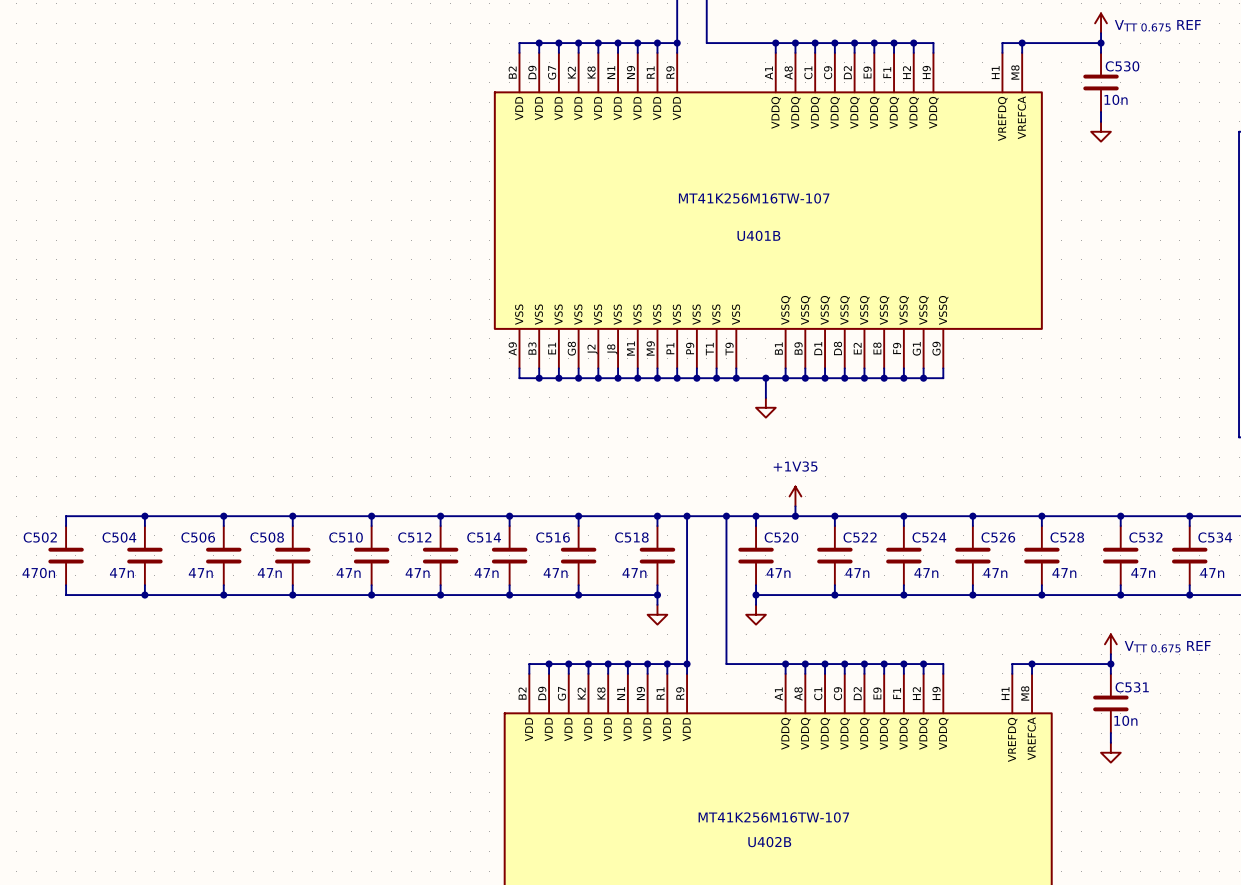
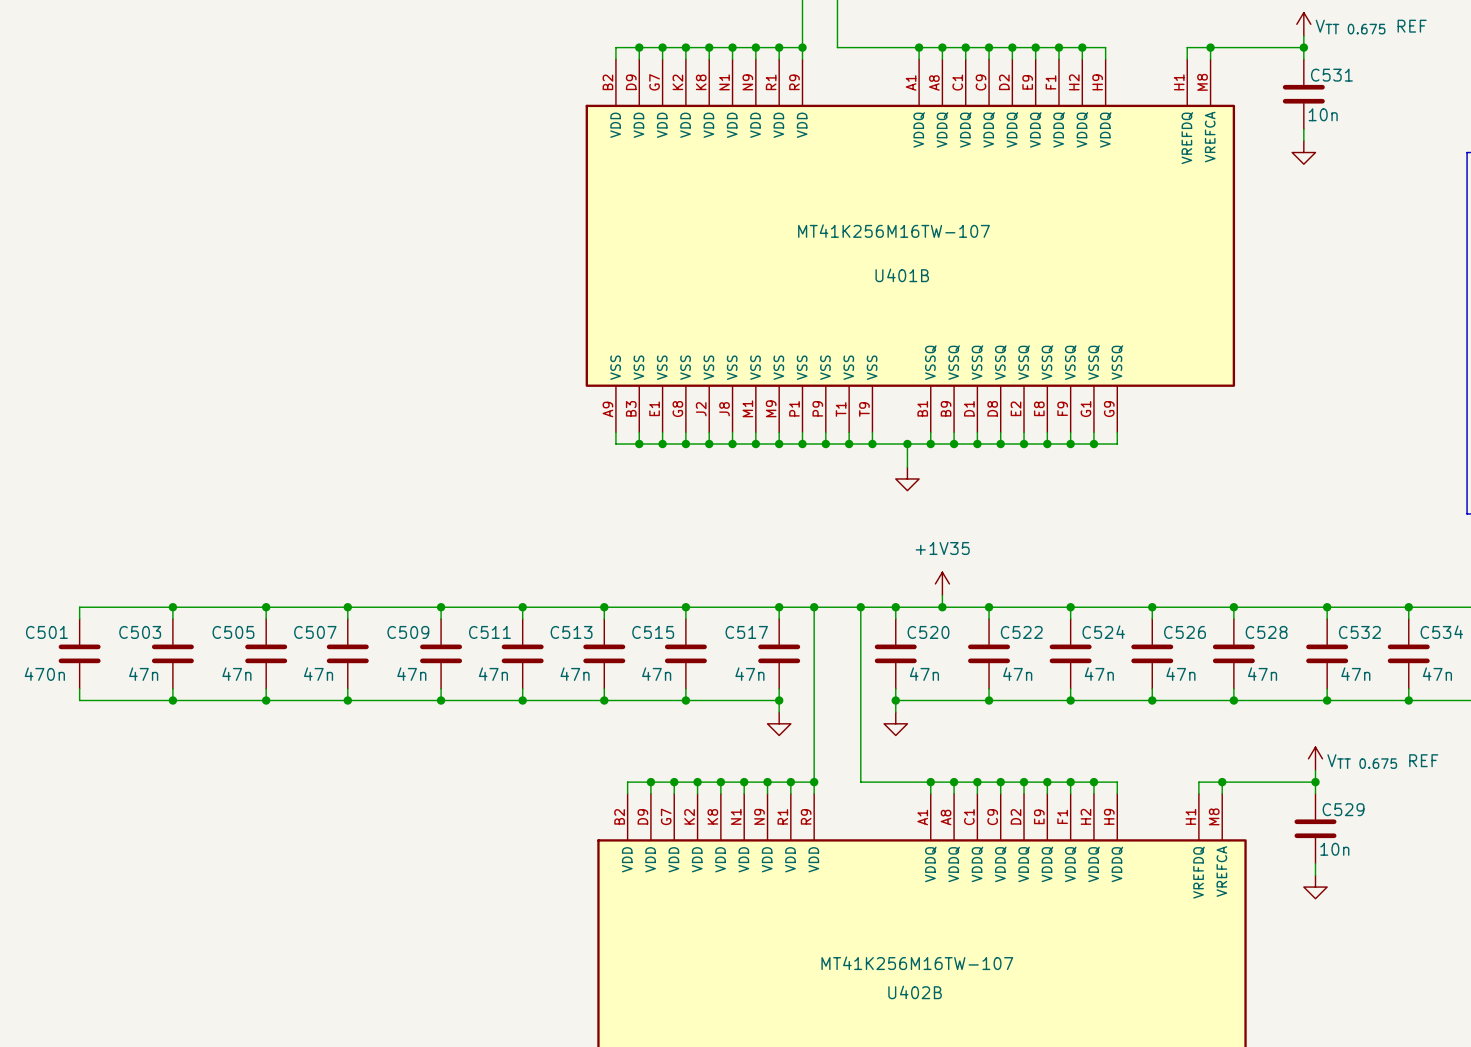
C530 name: C530 (1122, 66) -> C531 (1331, 75)
C502 name: C502 (40, 537) -> C501 (46, 632)
C504 name: C504 (119, 537) -> C503 (140, 632)
C506 name: C506 (198, 537) -> C505 (233, 632)
C508 name: C508 (267, 537) -> C507 (315, 632)
C510 name: C510 (346, 537) -> C509 (408, 632)
C512 name: C512 (414, 537) -> C511 (489, 632)
C514 name: C514 (484, 537) -> C513 (571, 632)
C516 name: C516 (553, 537) -> C515 (653, 632)
C518 name: C518 (631, 537) -> C517 (746, 632)
C531 name: C531 (1132, 687) -> C529 (1343, 809)

